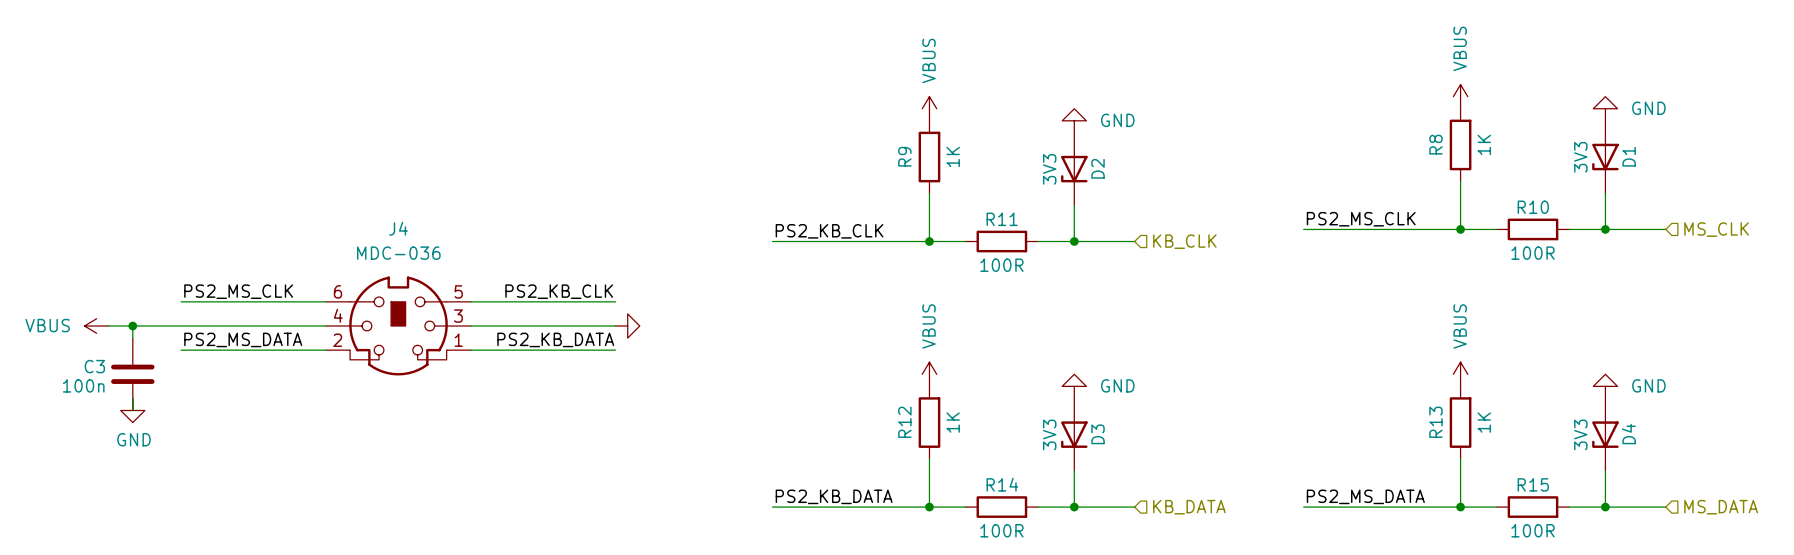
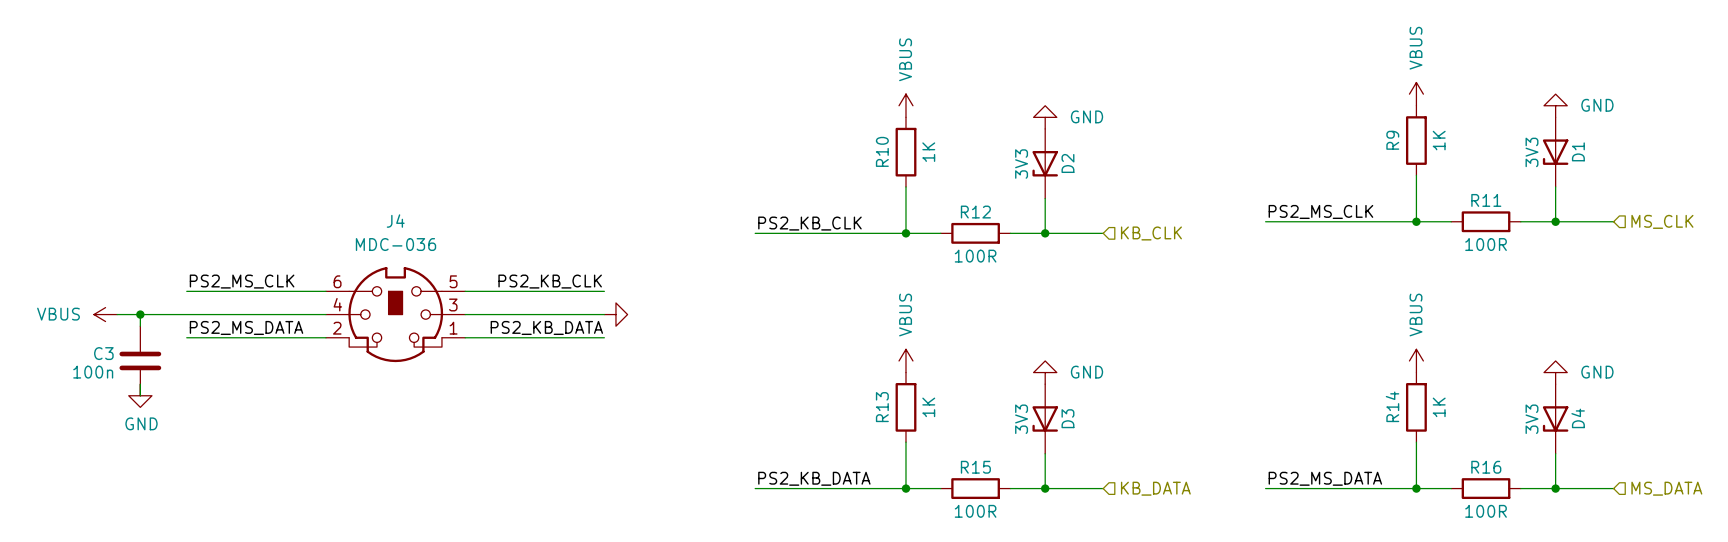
R8 name: R8 (1435, 144) -> R9 (1392, 140)
R9 name: R9 (904, 156) -> R10 (882, 151)
R10 name: R10 (1533, 207) -> R11 (1486, 200)
R11 name: R11 (1002, 219) -> R12 (975, 212)
R12 name: R12 (904, 422) -> R13 (882, 407)
R13 name: R13 (1435, 422) -> R14 (1392, 406)
R14 name: R14 (1002, 484) -> R15 (975, 467)
R15 name: R15 (1533, 484) -> R16 (1486, 467)

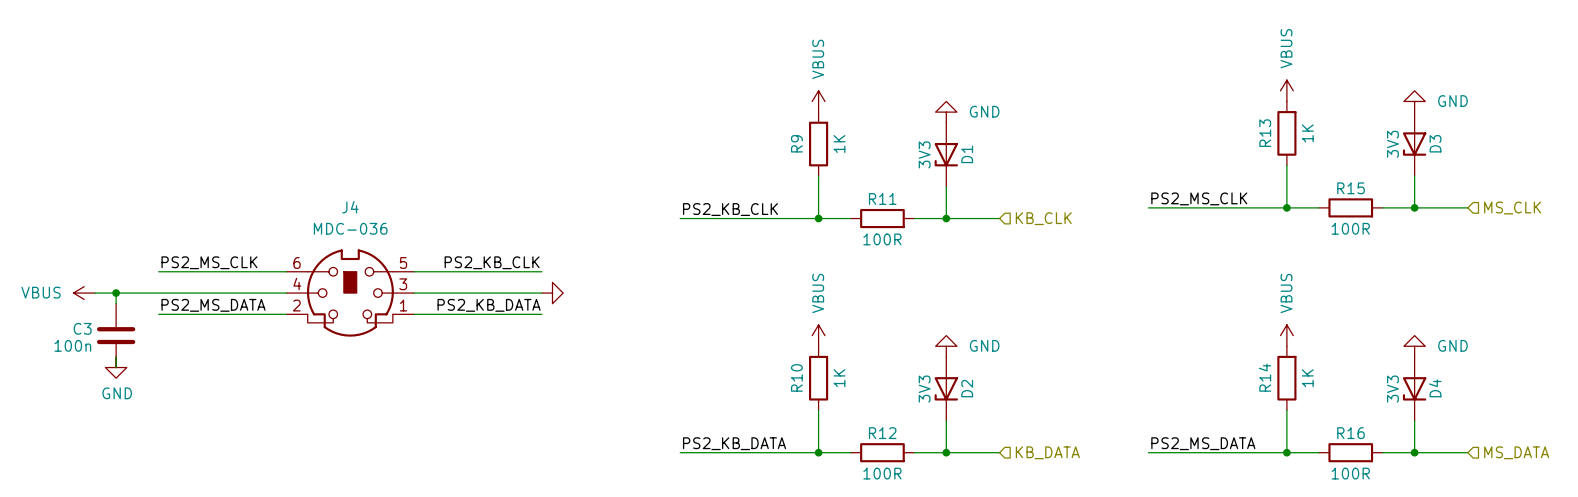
R9 name: R9 (1392, 140) -> R13 (1265, 133)
R10 name: R10 (882, 151) -> R9 (796, 143)
D1 name: D1 (1578, 151) -> D3 (1435, 143)
D2 name: D2 (1067, 163) -> D1 (967, 154)
R11 name: R11 (1486, 200) -> R15 (1351, 188)
R12 name: R12 (975, 212) -> R11 (882, 198)
R13 name: R13 (882, 407) -> R10 (796, 377)
D3 name: D3 (1067, 418) -> D2 (967, 388)
R15 name: R15 (975, 467) -> R12 (882, 433)

